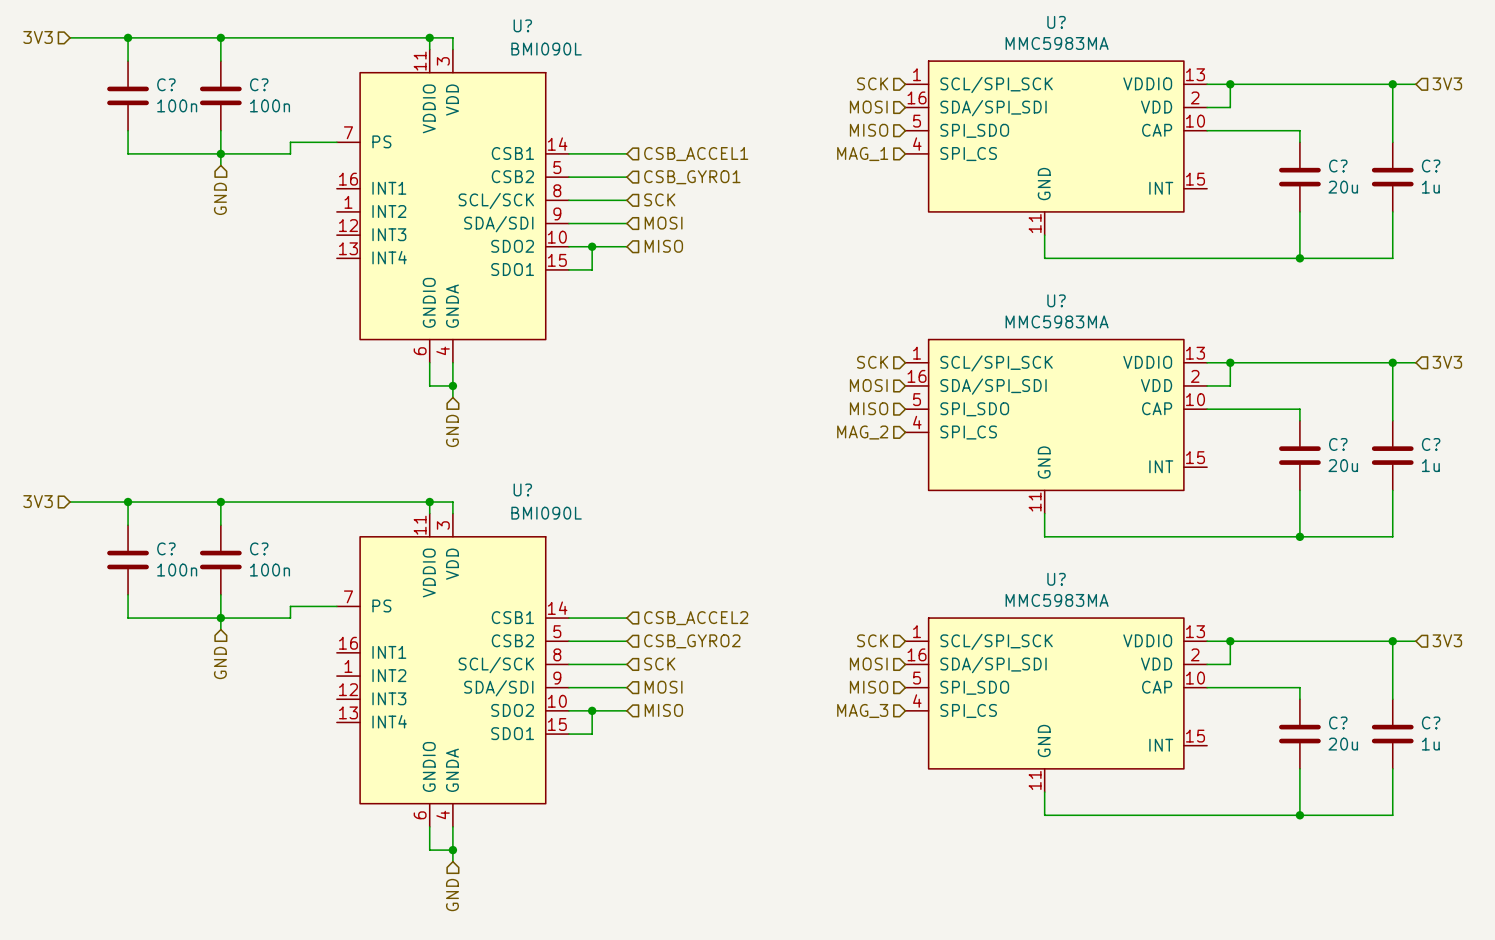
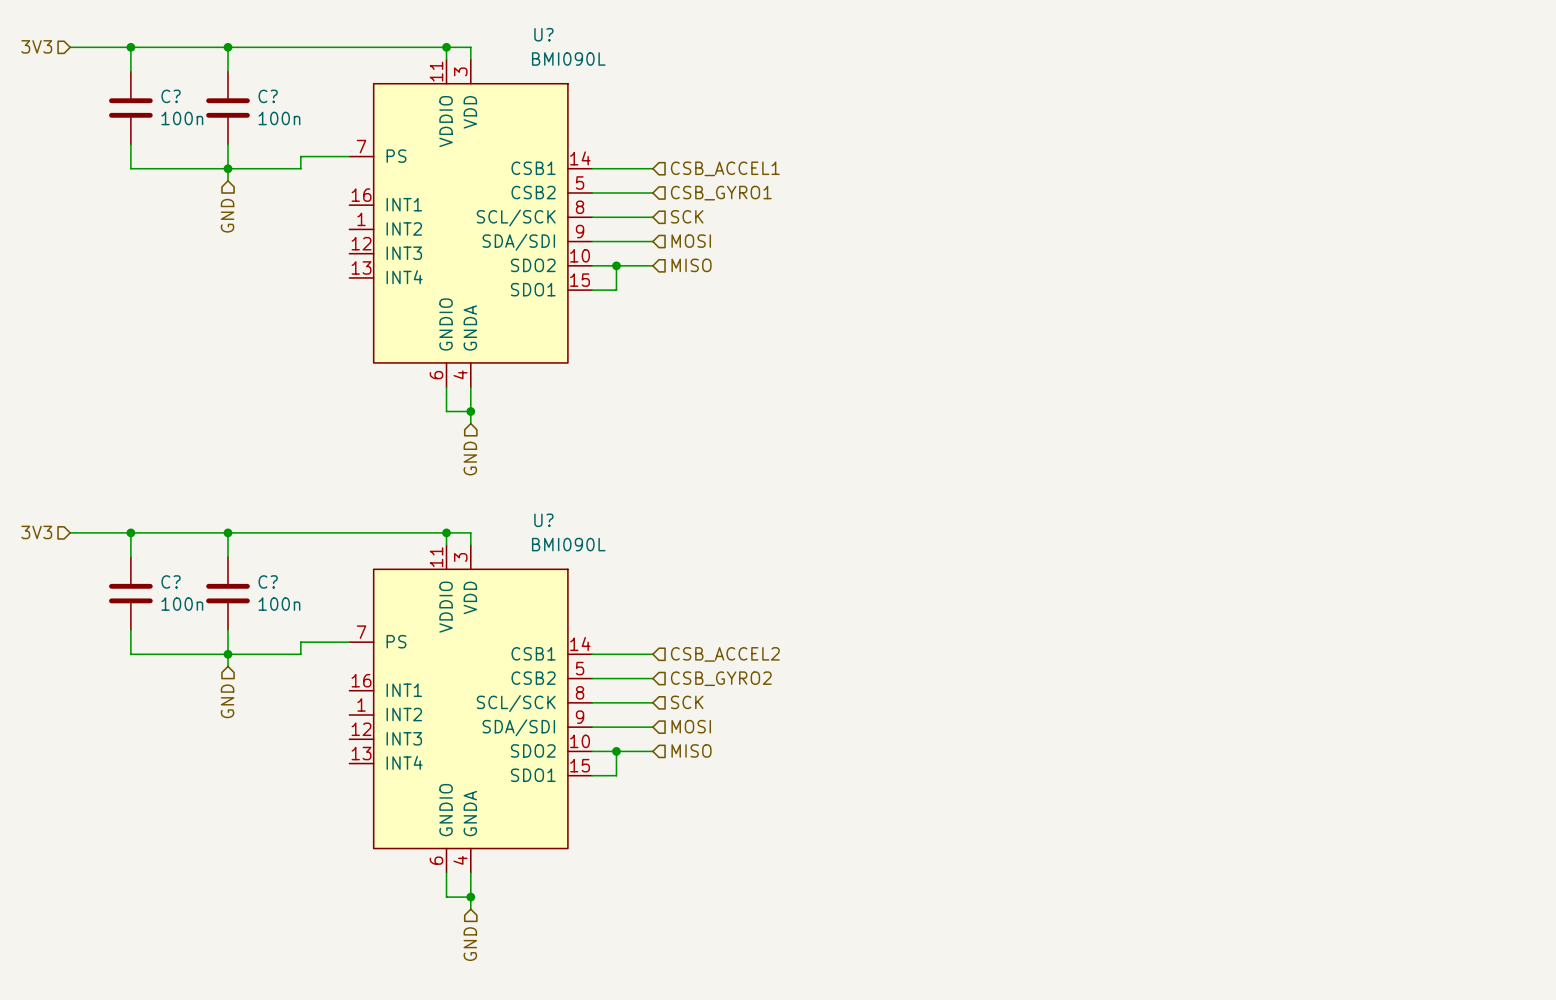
hierarchical label: SCK (872, 83) -> none
hierarchical label: 3V3 (1447, 83) -> none
wire: (1207, 84) (1415, 84) -> none
wire: (1230, 84) (1230, 107) (1207, 107) -> none
junction: (1230, 84) -> none
wire: (1392, 84) (1392, 142) -> none
junction: (1392, 84) -> none
hierarchical label: MOSI (868, 107) -> none
hierarchical label: MISO (869, 130) -> none
wire: (1207, 130) (1299, 130) (1299, 142) -> none
U?: MMC5983MA (1056, 148) -> none
hierarchical label: MAG_1 (862, 154) -> none
C?: 20u (1299, 177) -> none
C?: 1u (1392, 177) -> none
wire: (1299, 211) (1299, 258) -> none
wire: (1392, 211) (1392, 258) (1044, 258) (1044, 235) -> none
junction: (1299, 258) -> none
hierarchical label: SCK (872, 362) -> none
wire: (1207, 362) (1415, 362) -> none
wire: (1230, 362) (1230, 385) (1207, 385) -> none
junction: (1230, 362) -> none
wire: (1392, 362) (1392, 420) -> none
junction: (1392, 362) -> none
hierarchical label: 3V3 (1447, 362) -> none
hierarchical label: MOSI (868, 385) -> none
hierarchical label: MISO (869, 408) -> none
wire: (1207, 409) (1299, 409) (1299, 420) -> none
U?: MMC5983MA (1056, 426) -> none
hierarchical label: MAG_2 (862, 432) -> none
C?: 20u (1299, 455) -> none
C?: 1u (1392, 455) -> none
wire: (1299, 490) (1299, 536) -> none
wire: (1392, 490) (1392, 536) (1044, 536) (1044, 513) -> none
junction: (1299, 536) -> none
hierarchical label: SCK (872, 640) -> none
hierarchical label: 3V3 (1447, 640) -> none
wire: (1207, 641) (1415, 641) -> none
wire: (1230, 641) (1230, 664) (1207, 664) -> none
junction: (1230, 641) -> none
wire: (1392, 641) (1392, 699) -> none
junction: (1392, 641) -> none
hierarchical label: MOSI (868, 664) -> none
hierarchical label: MISO (869, 687) -> none
wire: (1207, 687) (1299, 687) (1299, 699) -> none
U?: MMC5983MA (1056, 705) -> none
hierarchical label: MAG_3 (862, 710) -> none
C?: 20u (1299, 734) -> none
C?: 1u (1392, 734) -> none
wire: (1299, 768) (1299, 815) -> none
wire: (1392, 768) (1392, 815) (1044, 815) (1044, 792) -> none
junction: (1299, 815) -> none

